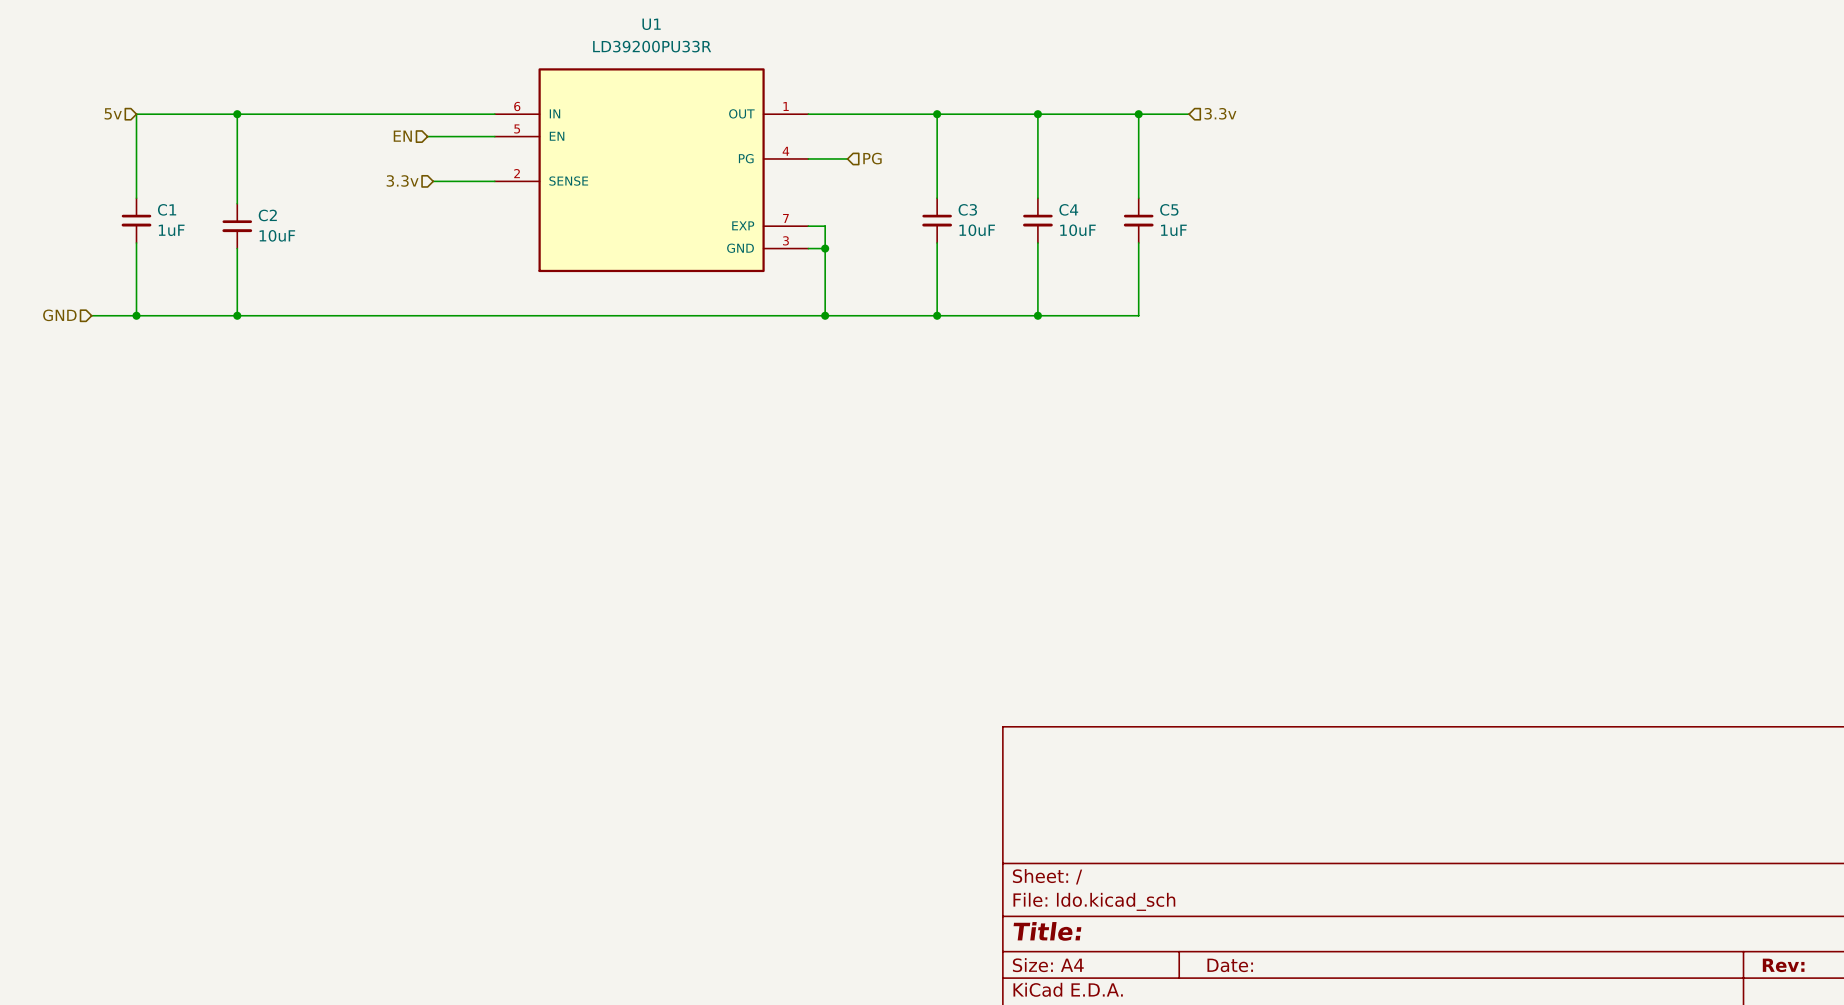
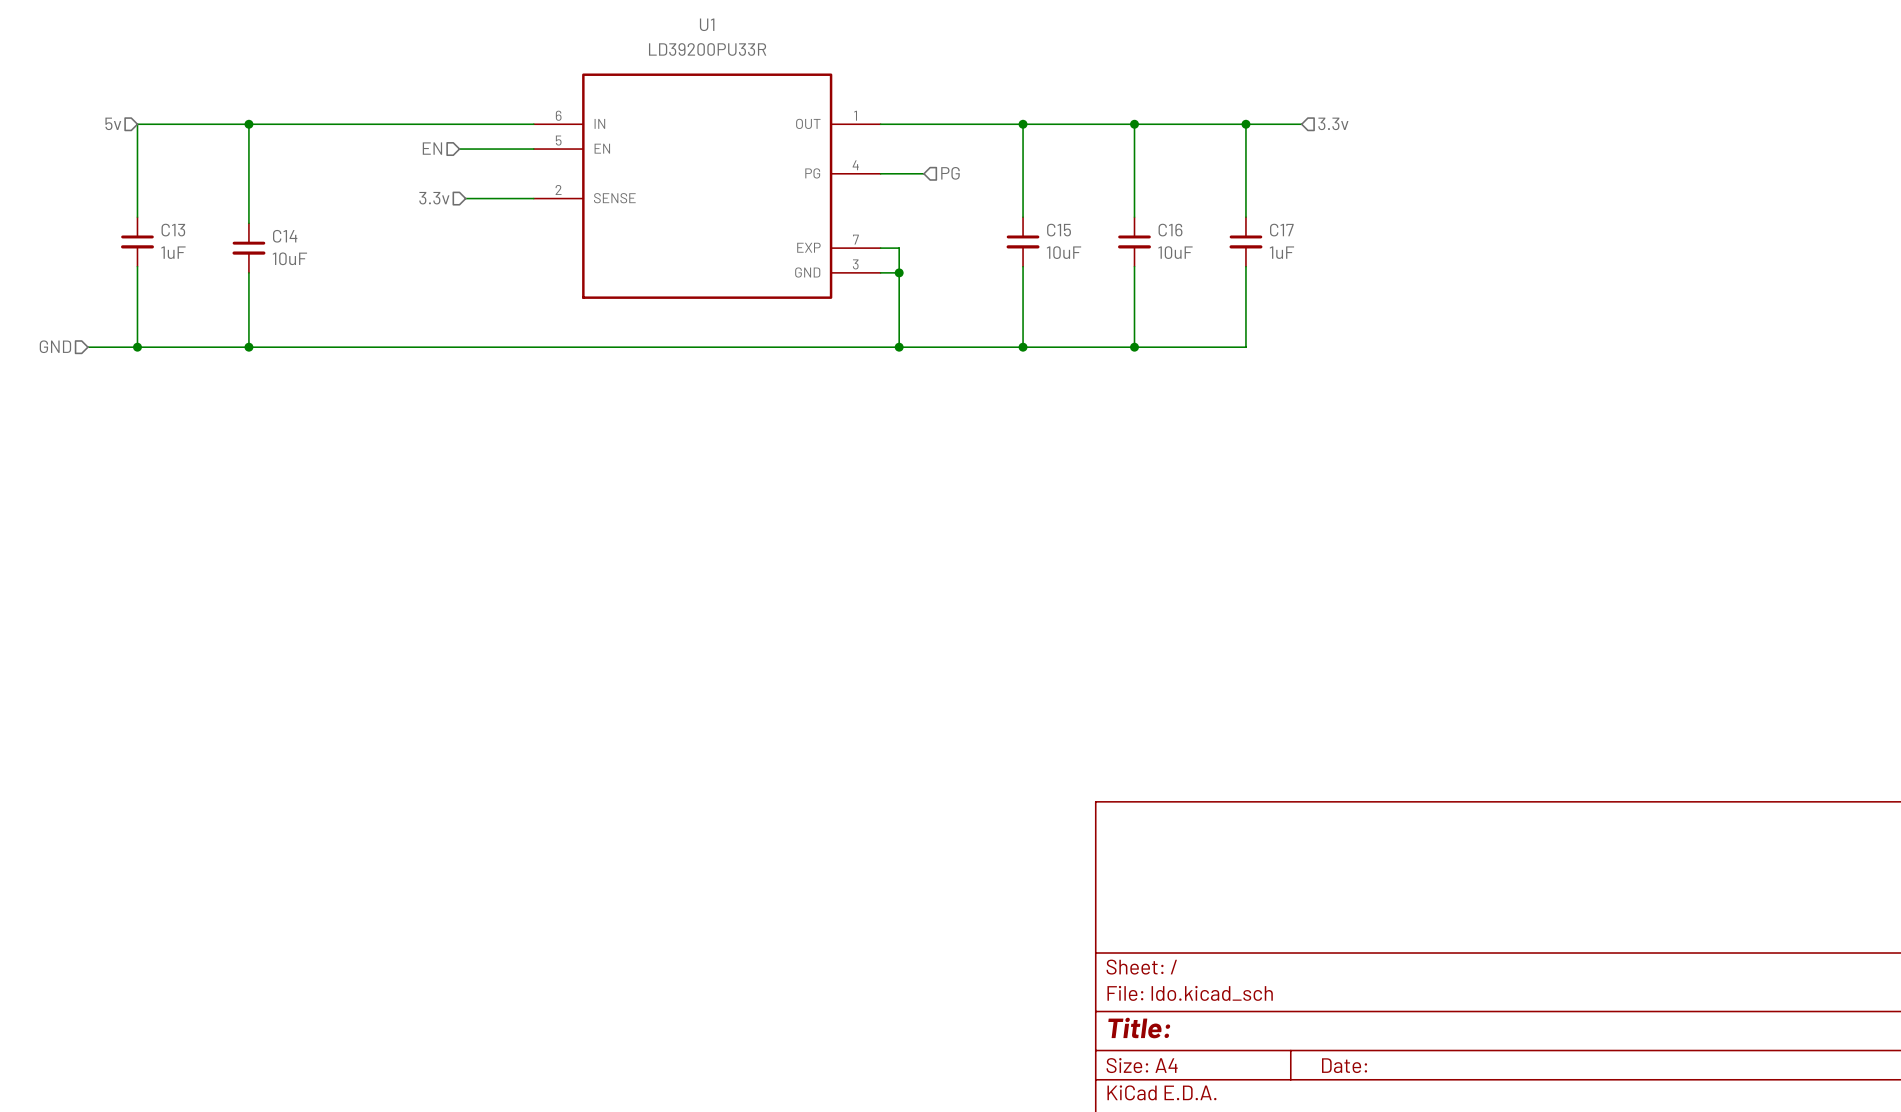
C1 name: C1 (167, 209) -> C13 (173, 230)
C3 name: C3 (967, 209) -> C15 (1059, 230)
C4 name: C4 (1068, 209) -> C16 (1170, 230)
C5 name: C5 (1169, 209) -> C17 (1281, 230)
C2 name: C2 (267, 215) -> C14 (285, 236)

